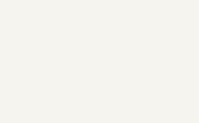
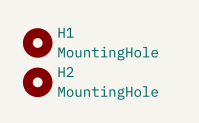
H1: none -> MountingHole (37, 42)
H2: none -> MountingHole (37, 82)

